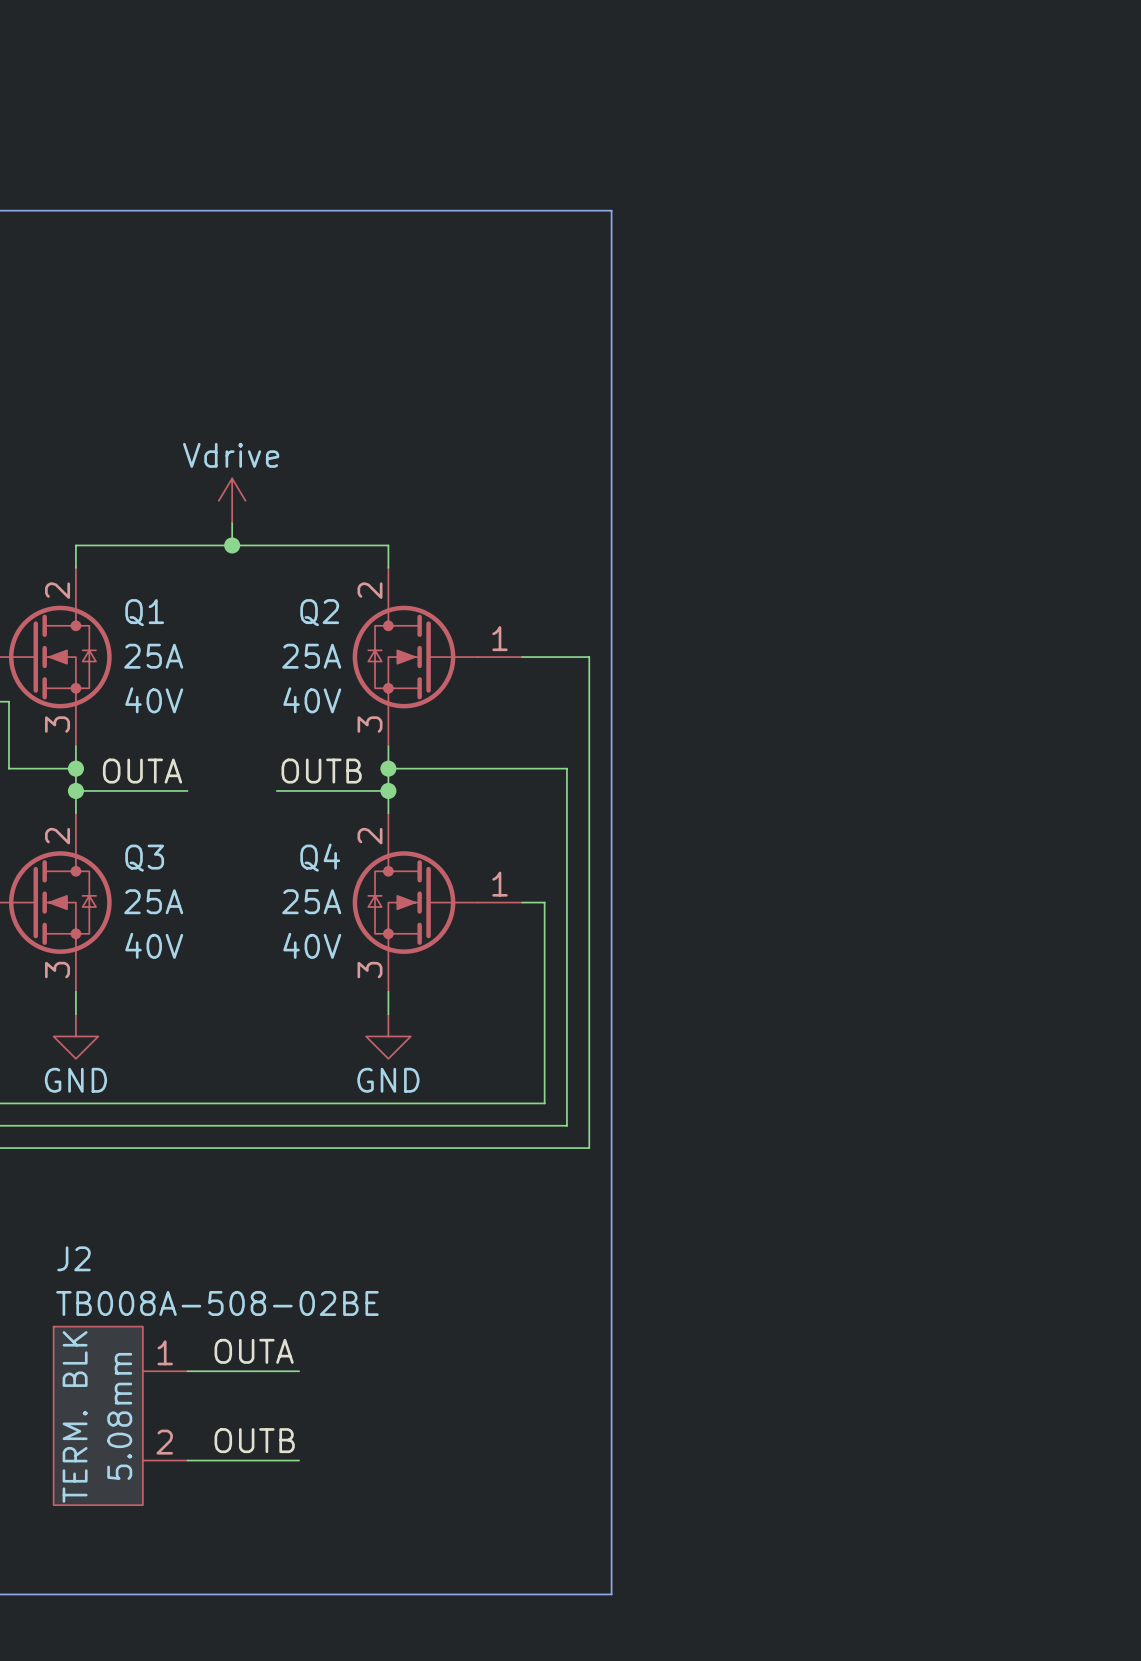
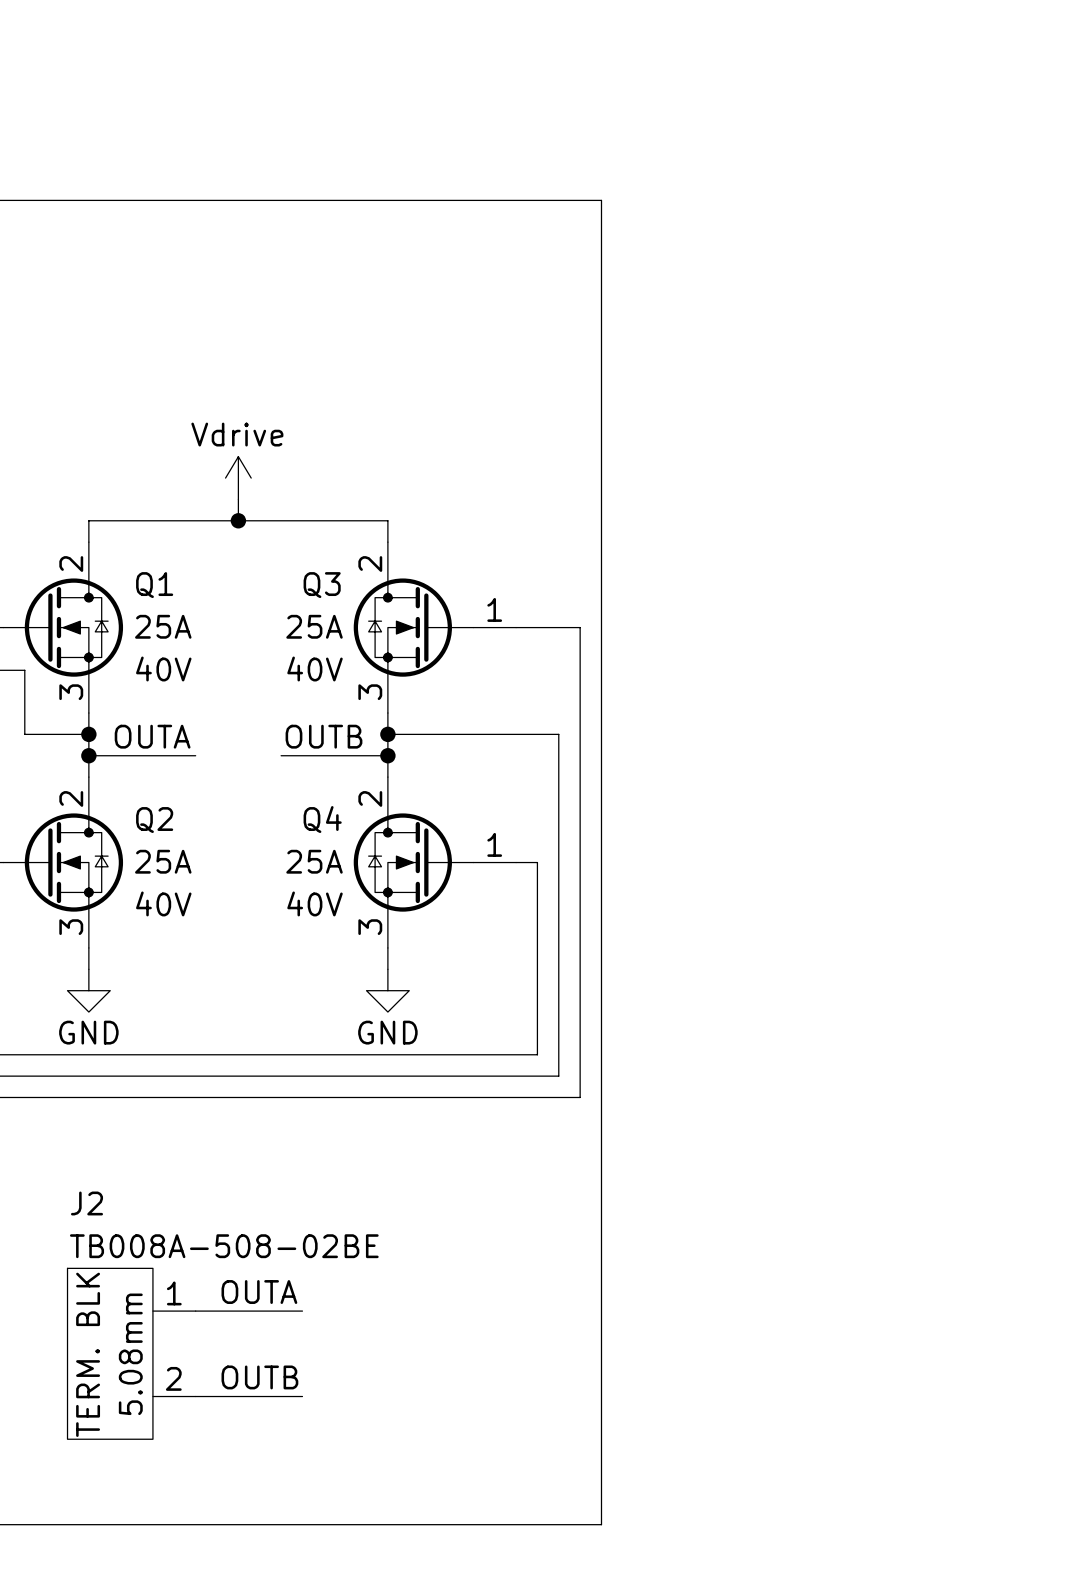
Q2 name: Q2 (319, 612) -> Q3 (322, 585)
Q3 name: Q3 (144, 858) -> Q2 (154, 820)

